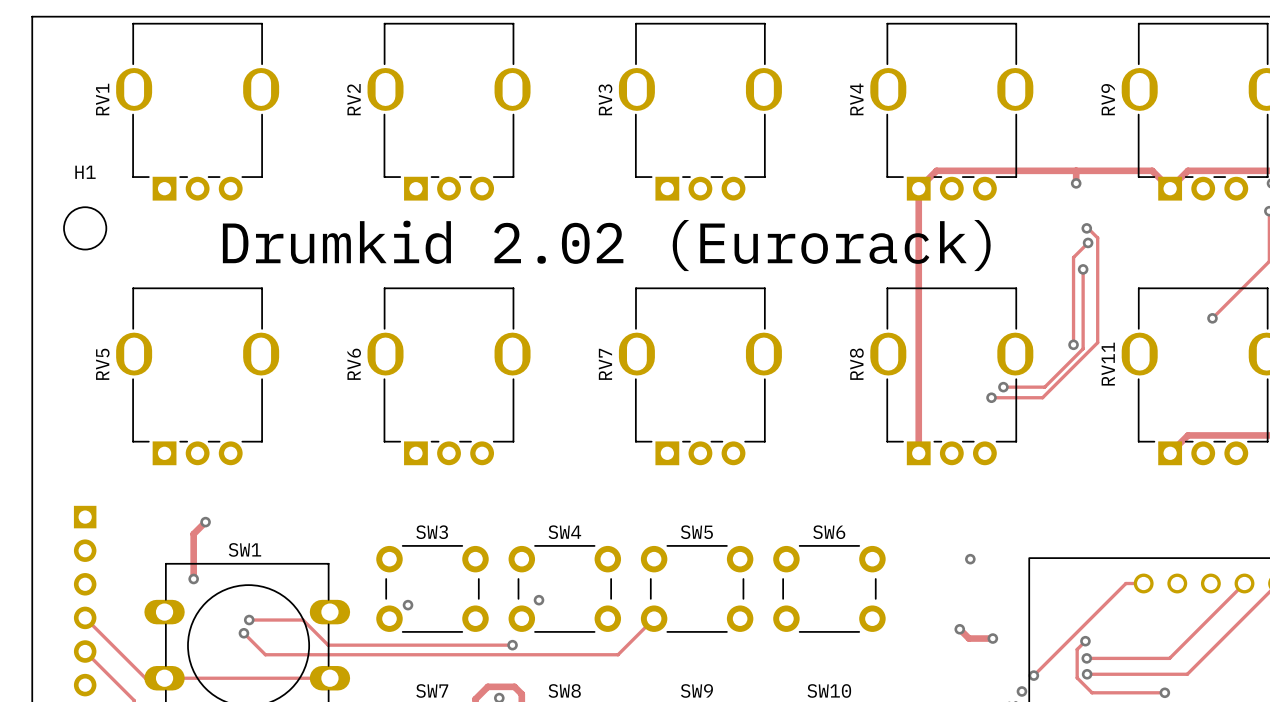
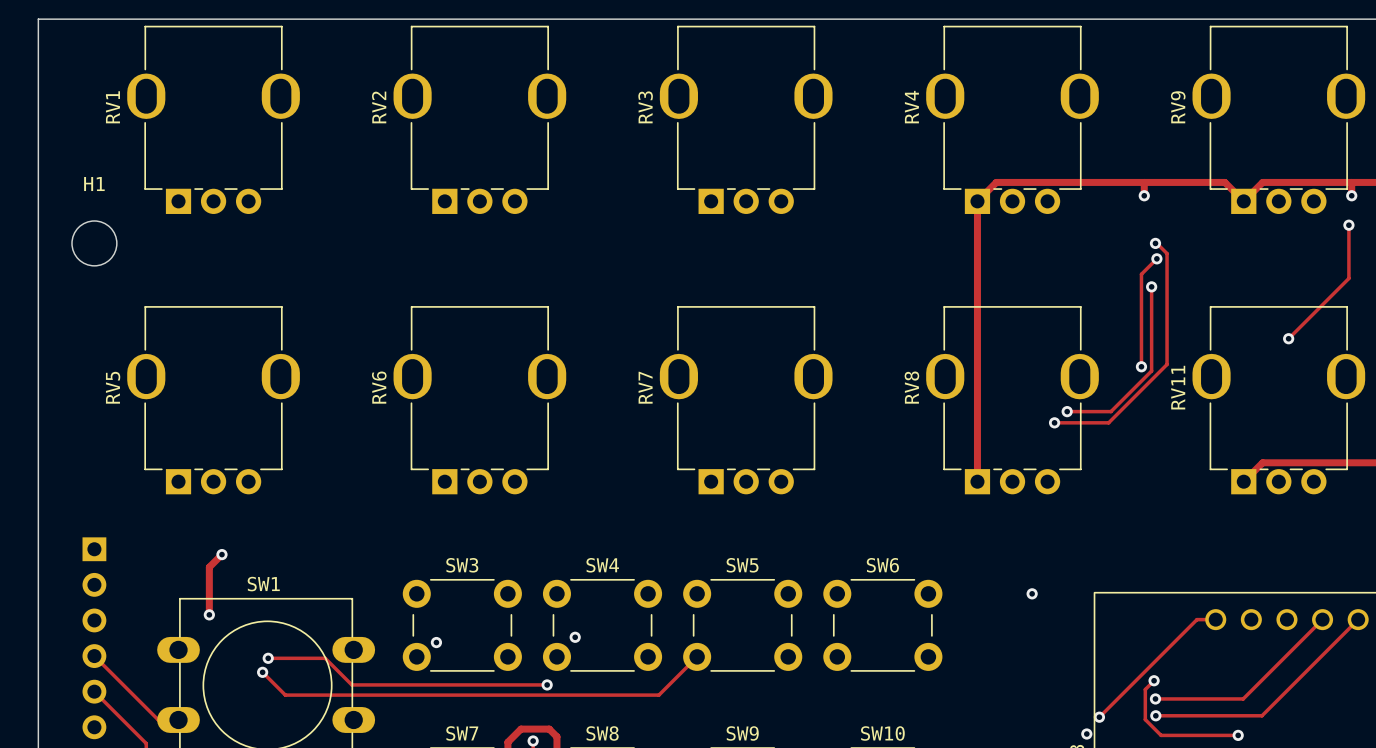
text: Drumkid 2.02 (Eurorack) (606, 245) -> none
track: (959, 629) (969, 638) (992, 638) -> none
via: (959, 629) -> none
via: (992, 638) -> none
track: (164, 678) (329, 678) -> none

